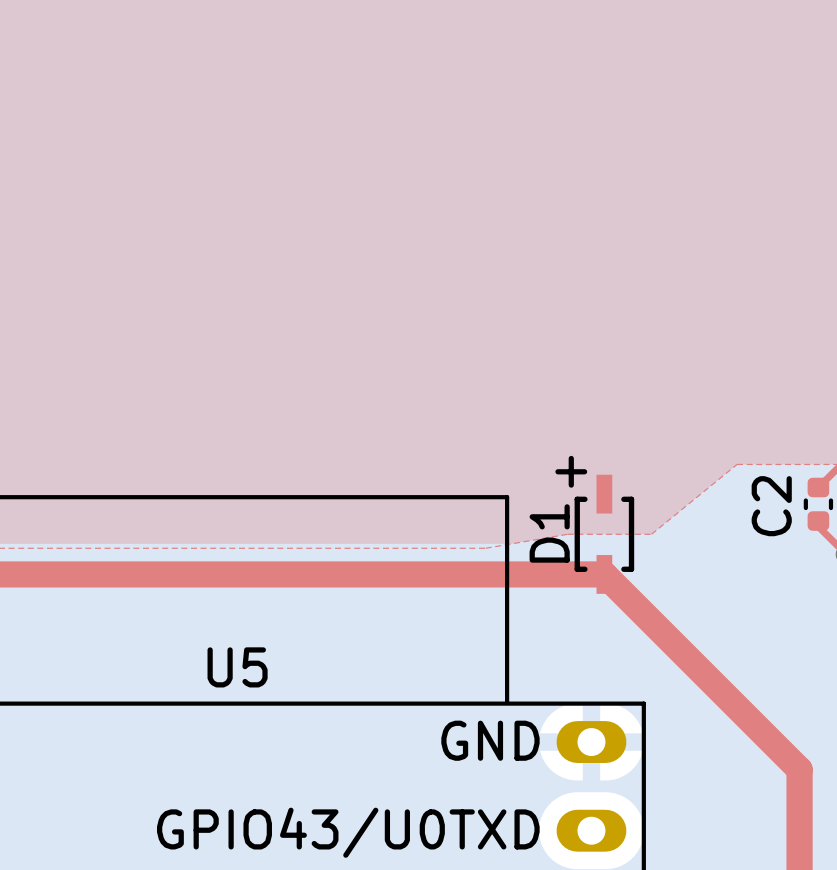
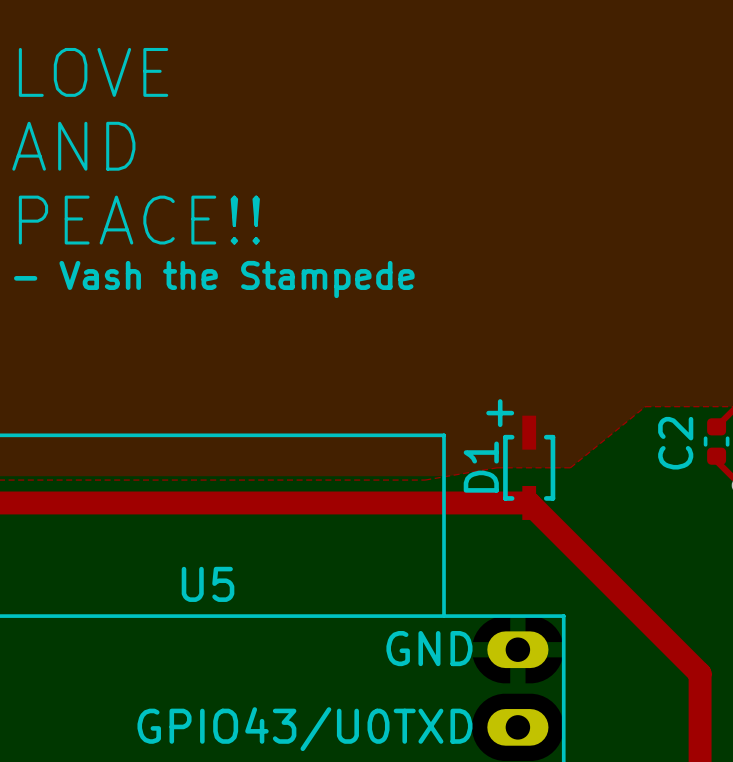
text: none -> LOVE (93, 72)
text: none -> AND (73, 146)
text: none -> PEACE!! (139, 220)
text: none -> - Vash the Stampede (214, 279)

